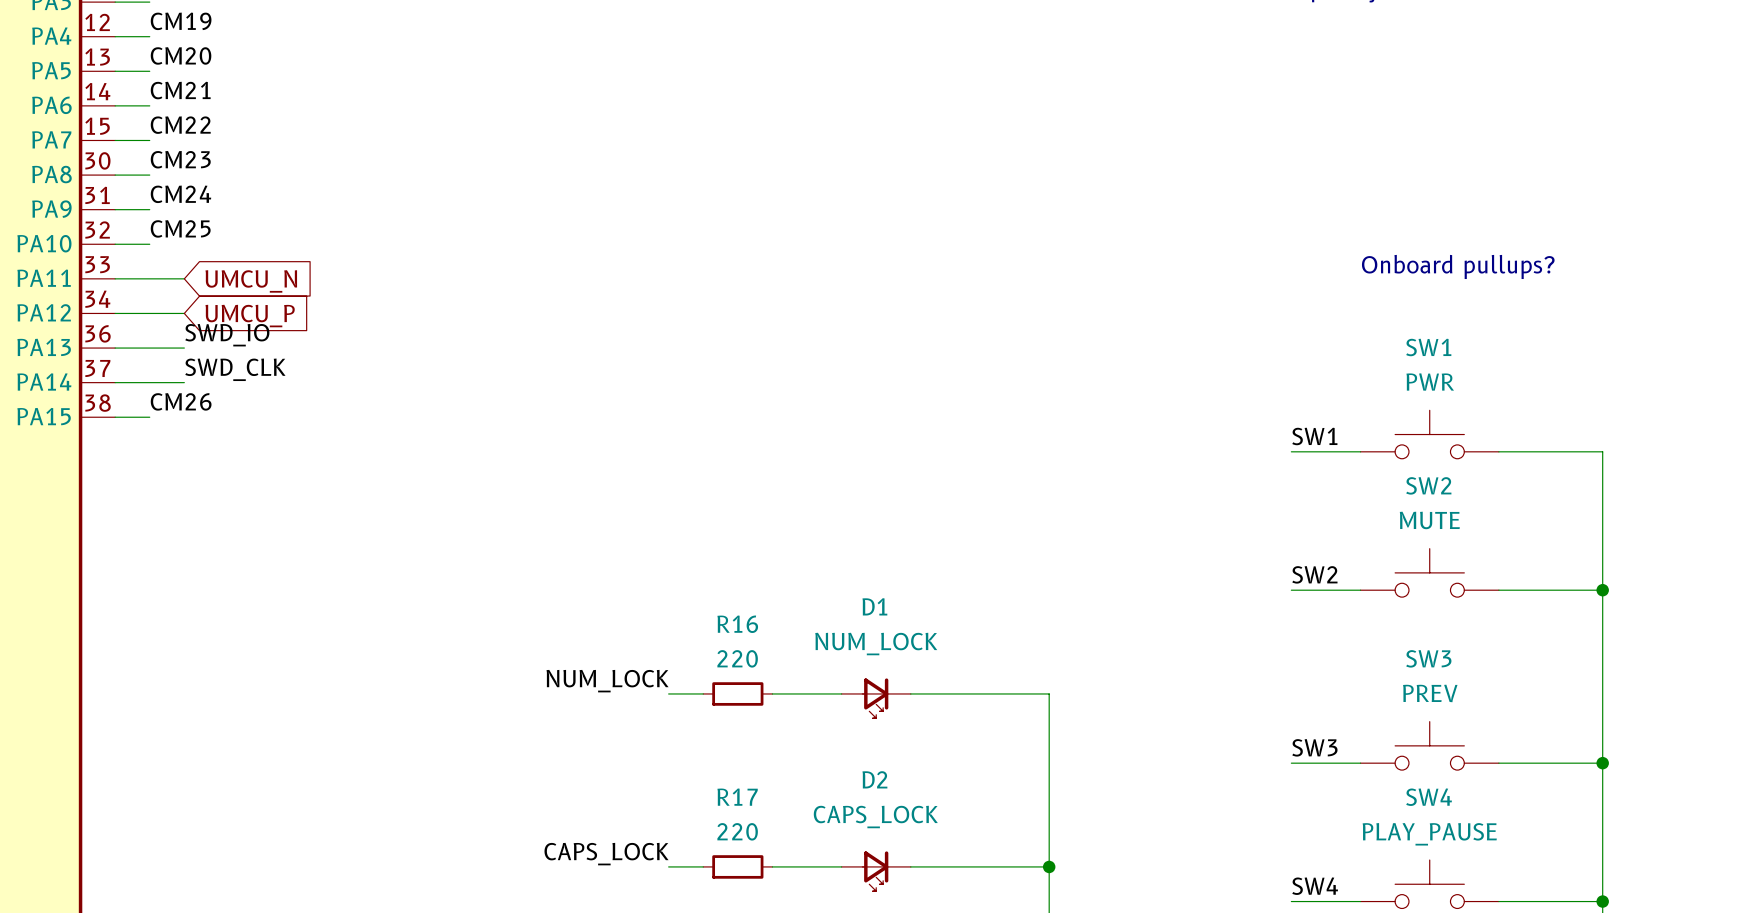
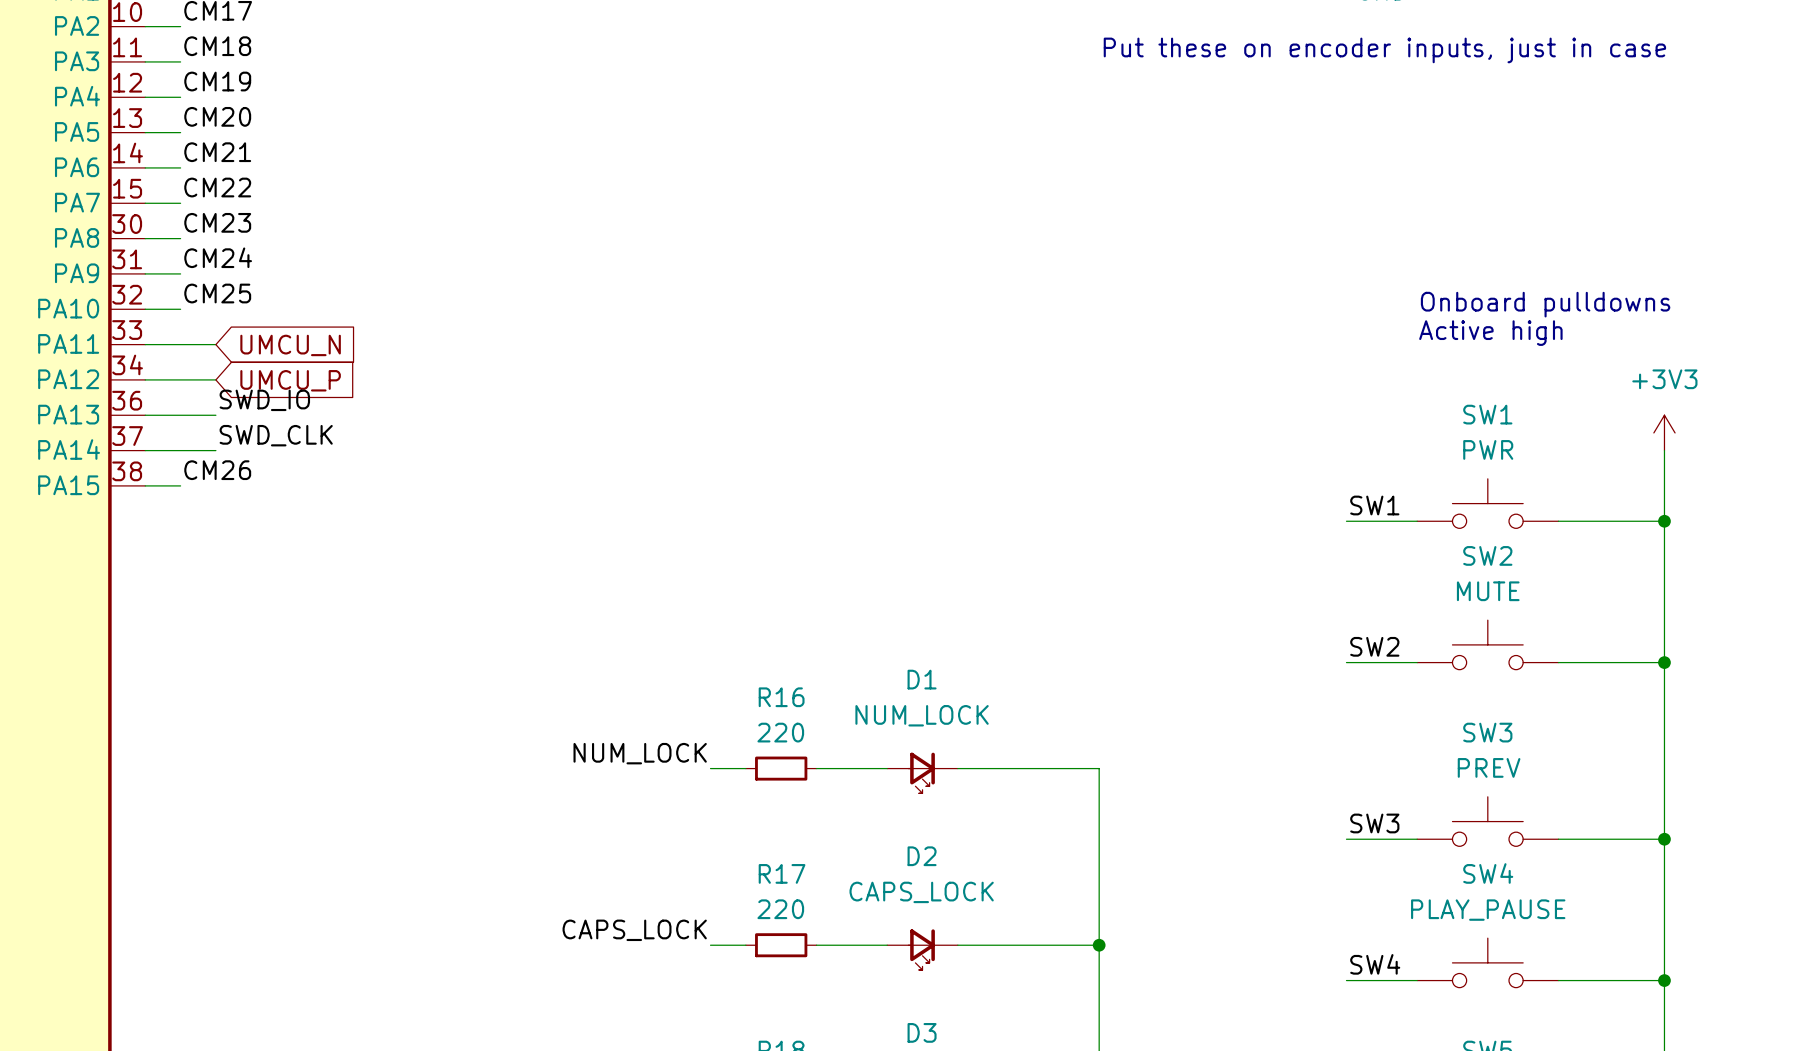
text: none -> Onboard pulldowns (1545, 304)
text: Onboard pullups? (1458, 266) -> Active high (1490, 333)
power symbol: none -> +3V3 (1664, 432)
wire: none -> (1664, 450) (1664, 521)
junction: none -> (1664, 521)

